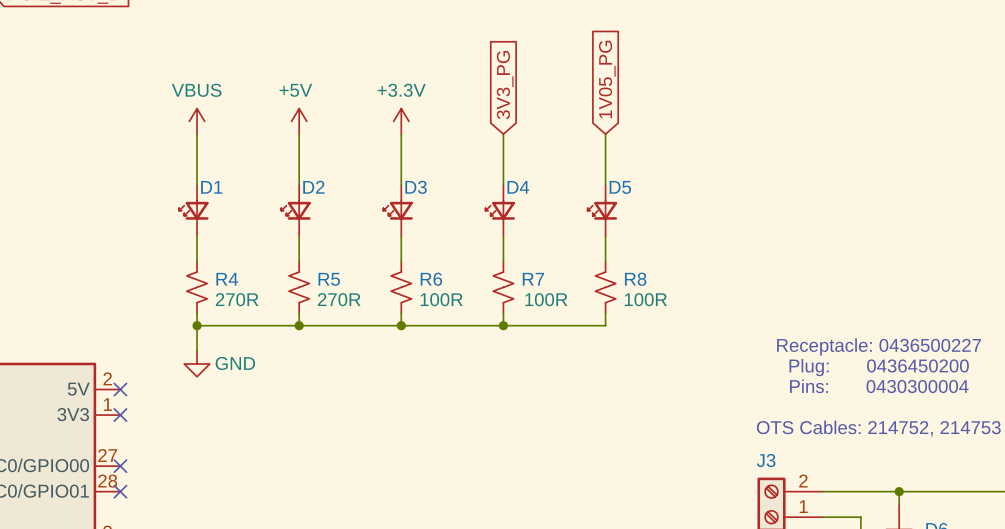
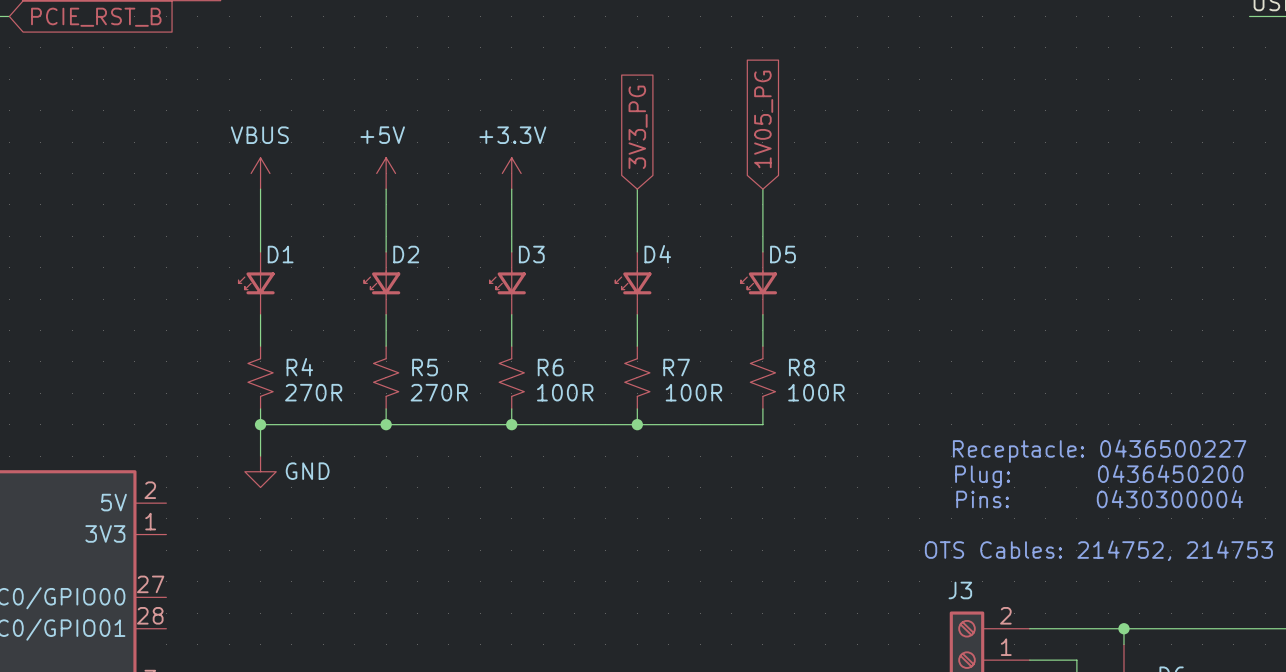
no-connect mark: (120, 389) -> none
no-connect mark: (120, 415) -> none
no-connect mark: (120, 466) -> none
no-connect mark: (120, 491) -> none

